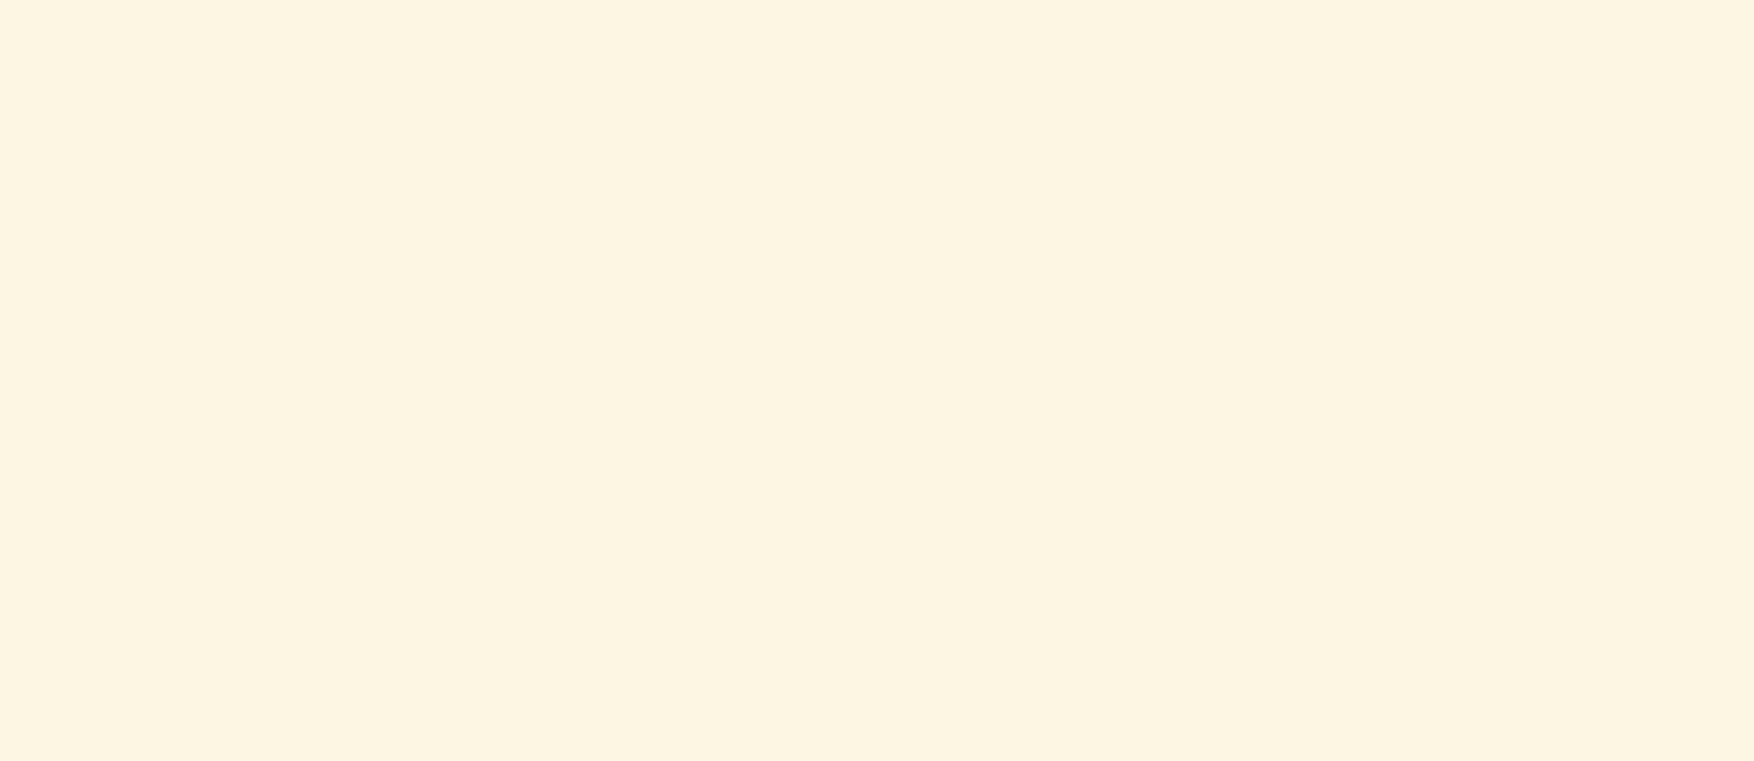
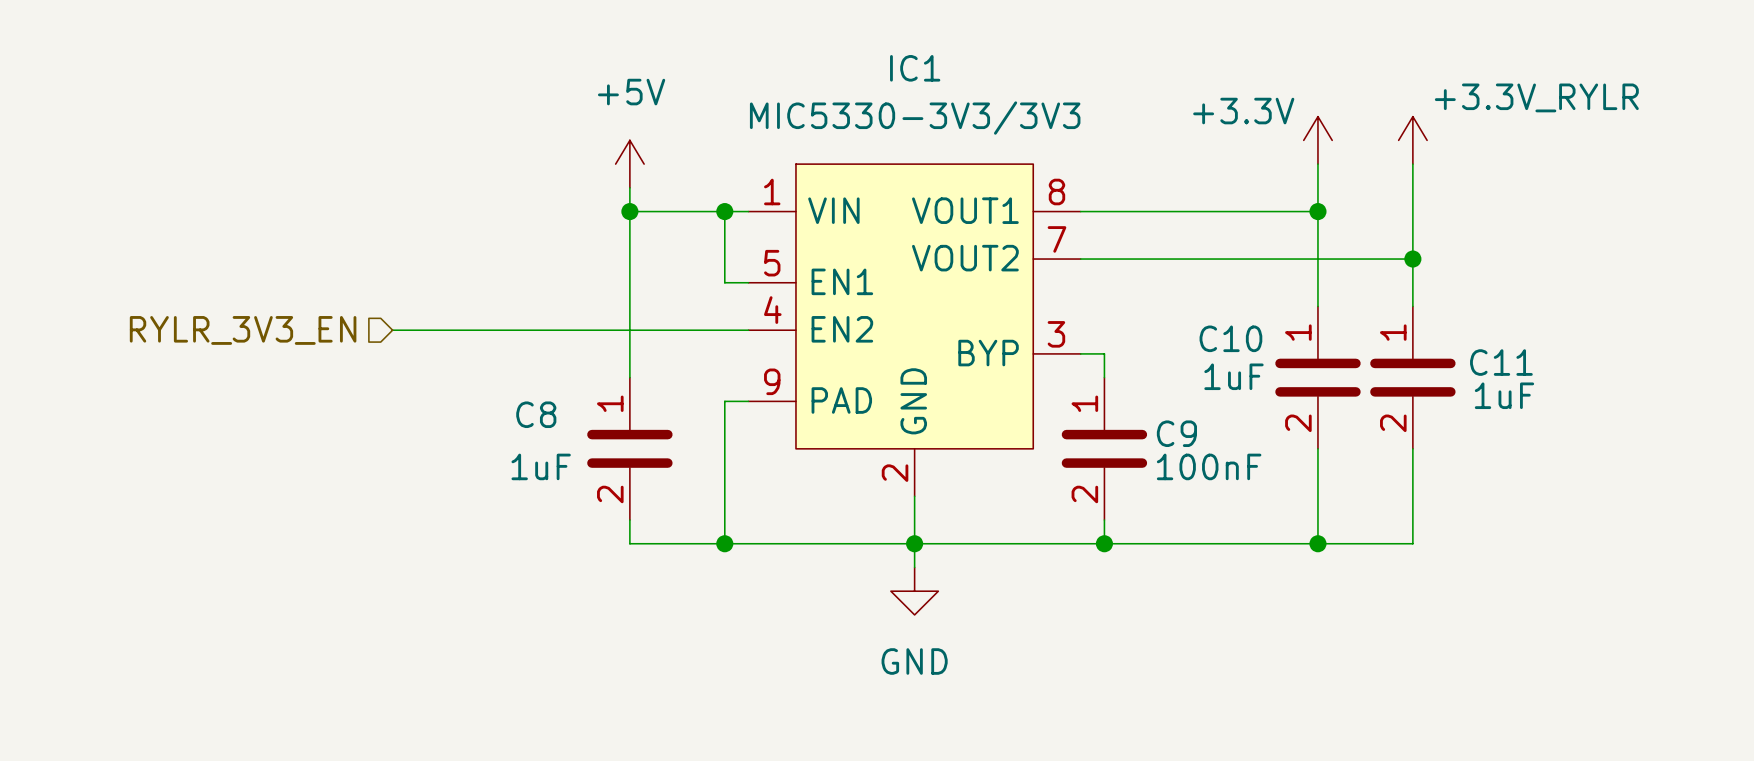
power symbol: none -> +3.3V (1317, 140)
power symbol: none -> +3.3V_RYLR (1412, 140)
power symbol: none -> +5V (629, 164)
wire: none -> (1317, 164) (1317, 306)
wire: none -> (1412, 164) (1412, 306)
wire: none -> (629, 187) (629, 377)
wire: none -> (629, 211) (748, 211)
junction: none -> (629, 211)
wire: none -> (724, 211) (724, 282) (748, 282)
junction: none -> (724, 211)
wire: none -> (1080, 211) (1317, 211)
junction: none -> (1317, 211)
wire: none -> (1080, 259) (1412, 259)
junction: none -> (1412, 259)
hierarchical label: none -> RYLR_3V3_EN (243, 330)
wire: none -> (392, 330) (748, 330)
IC1: none -> (914, 330)
wire: none -> (1080, 353) (1104, 353) (1104, 377)
C10: none -> (1317, 377)
C11: none -> (1412, 377)
wire: none -> (748, 401) (724, 401) (724, 543)
C8: none -> (629, 448)
C9: none -> (1104, 448)
wire: none -> (1317, 448) (1317, 543)
wire: none -> (1412, 448) (1412, 543) (629, 543) (629, 520)
wire: none -> (914, 496) (914, 567)
wire: none -> (1104, 520) (1104, 543)
junction: none -> (724, 543)
junction: none -> (914, 543)
junction: none -> (1104, 543)
junction: none -> (1317, 543)
power symbol: none -> GND (914, 591)

